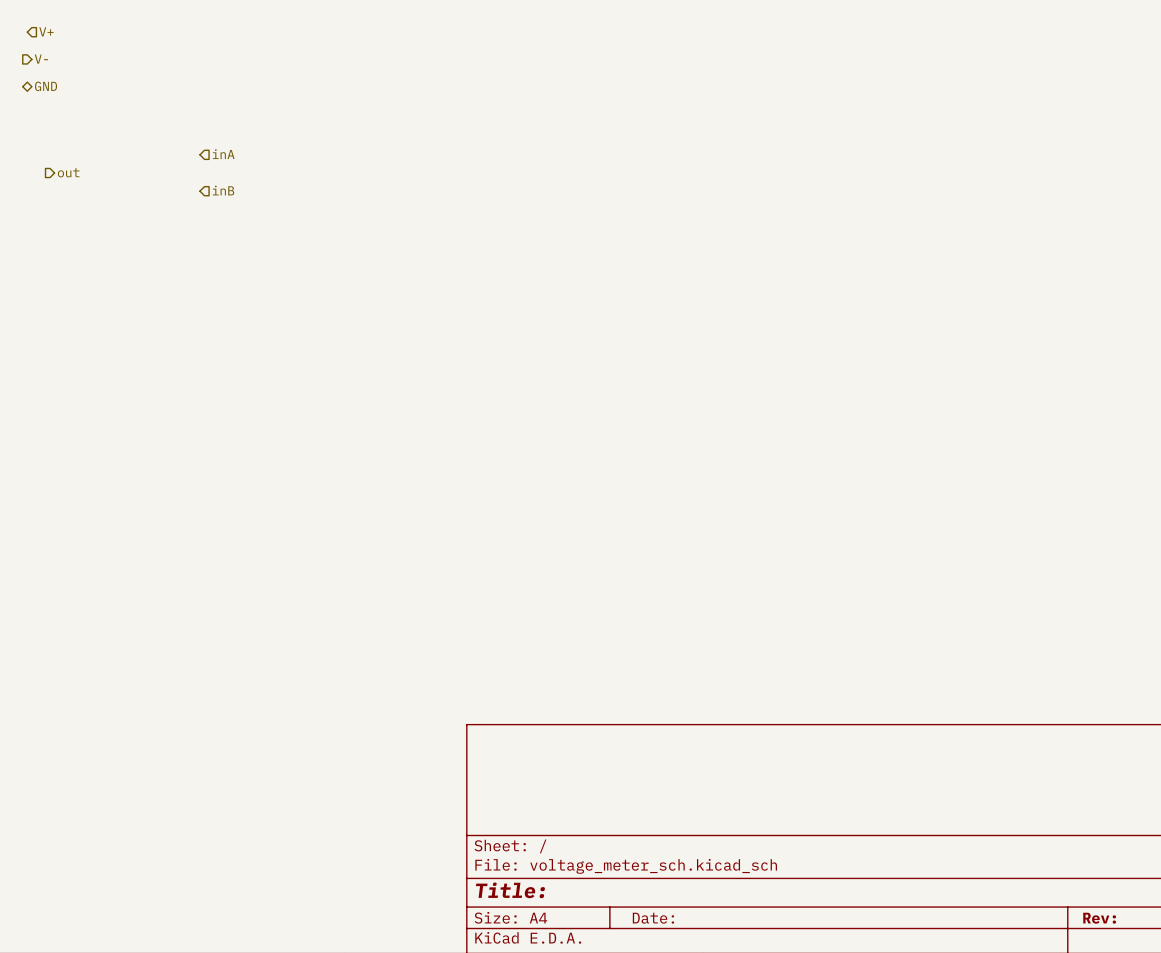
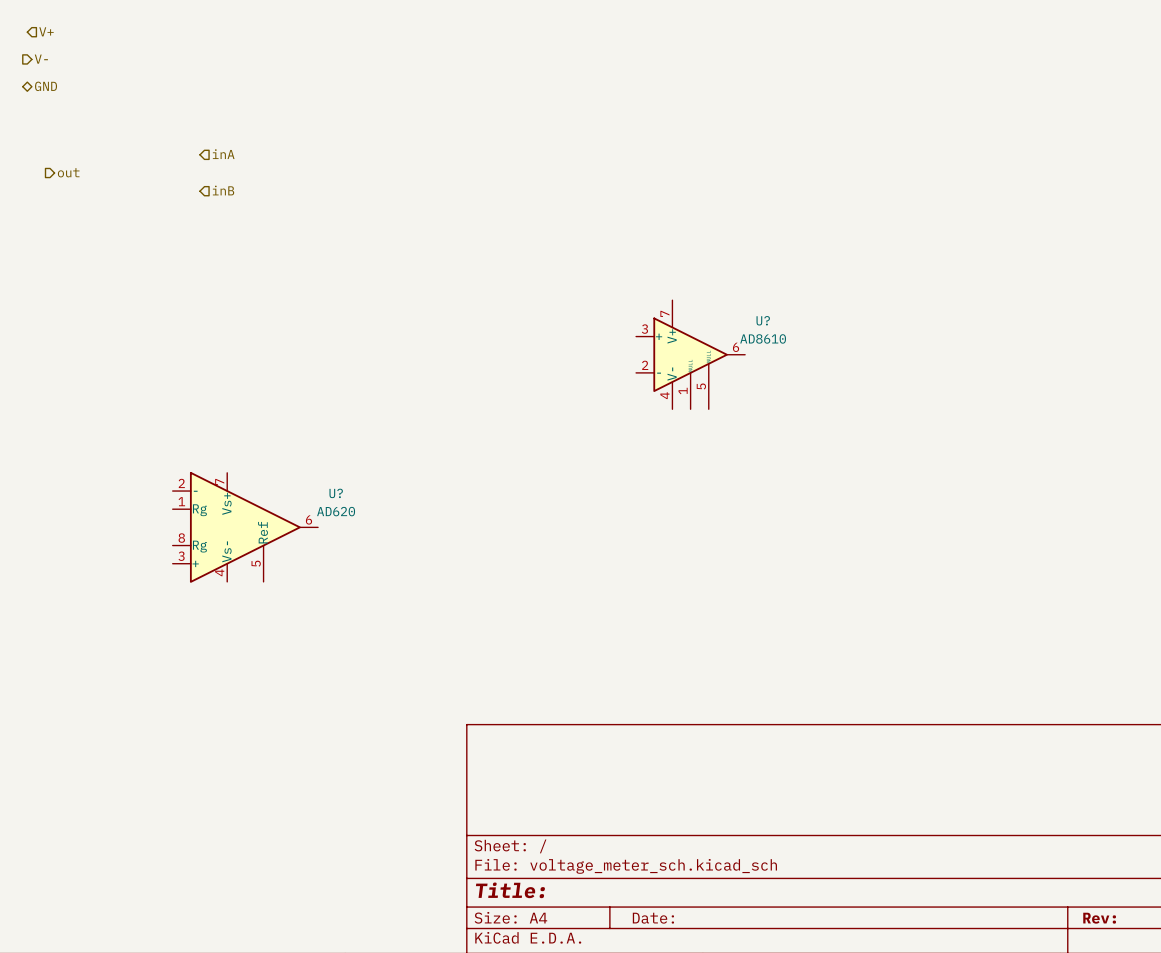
U?: none -> AD8610 (690, 354)
U?: none -> AD620 (245, 527)

